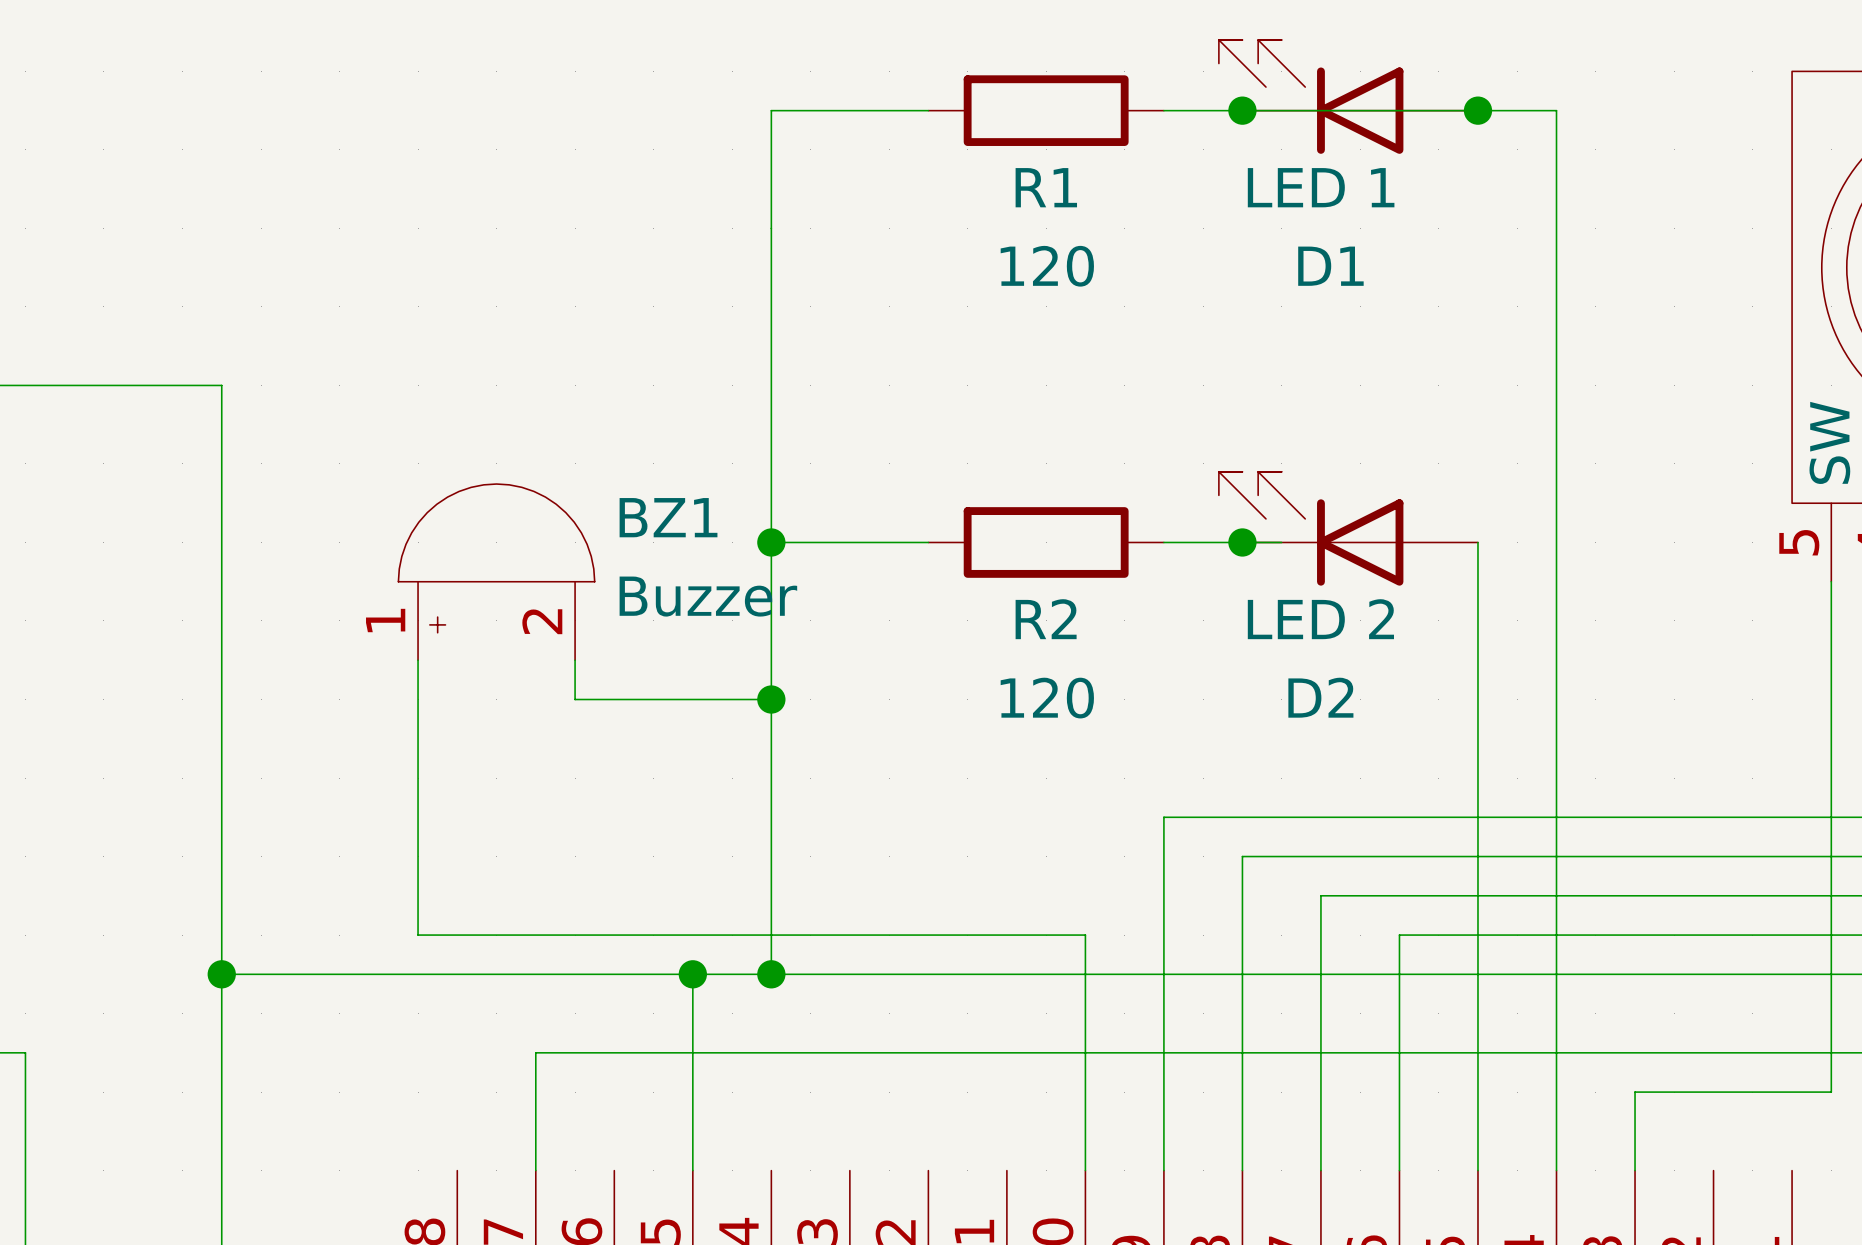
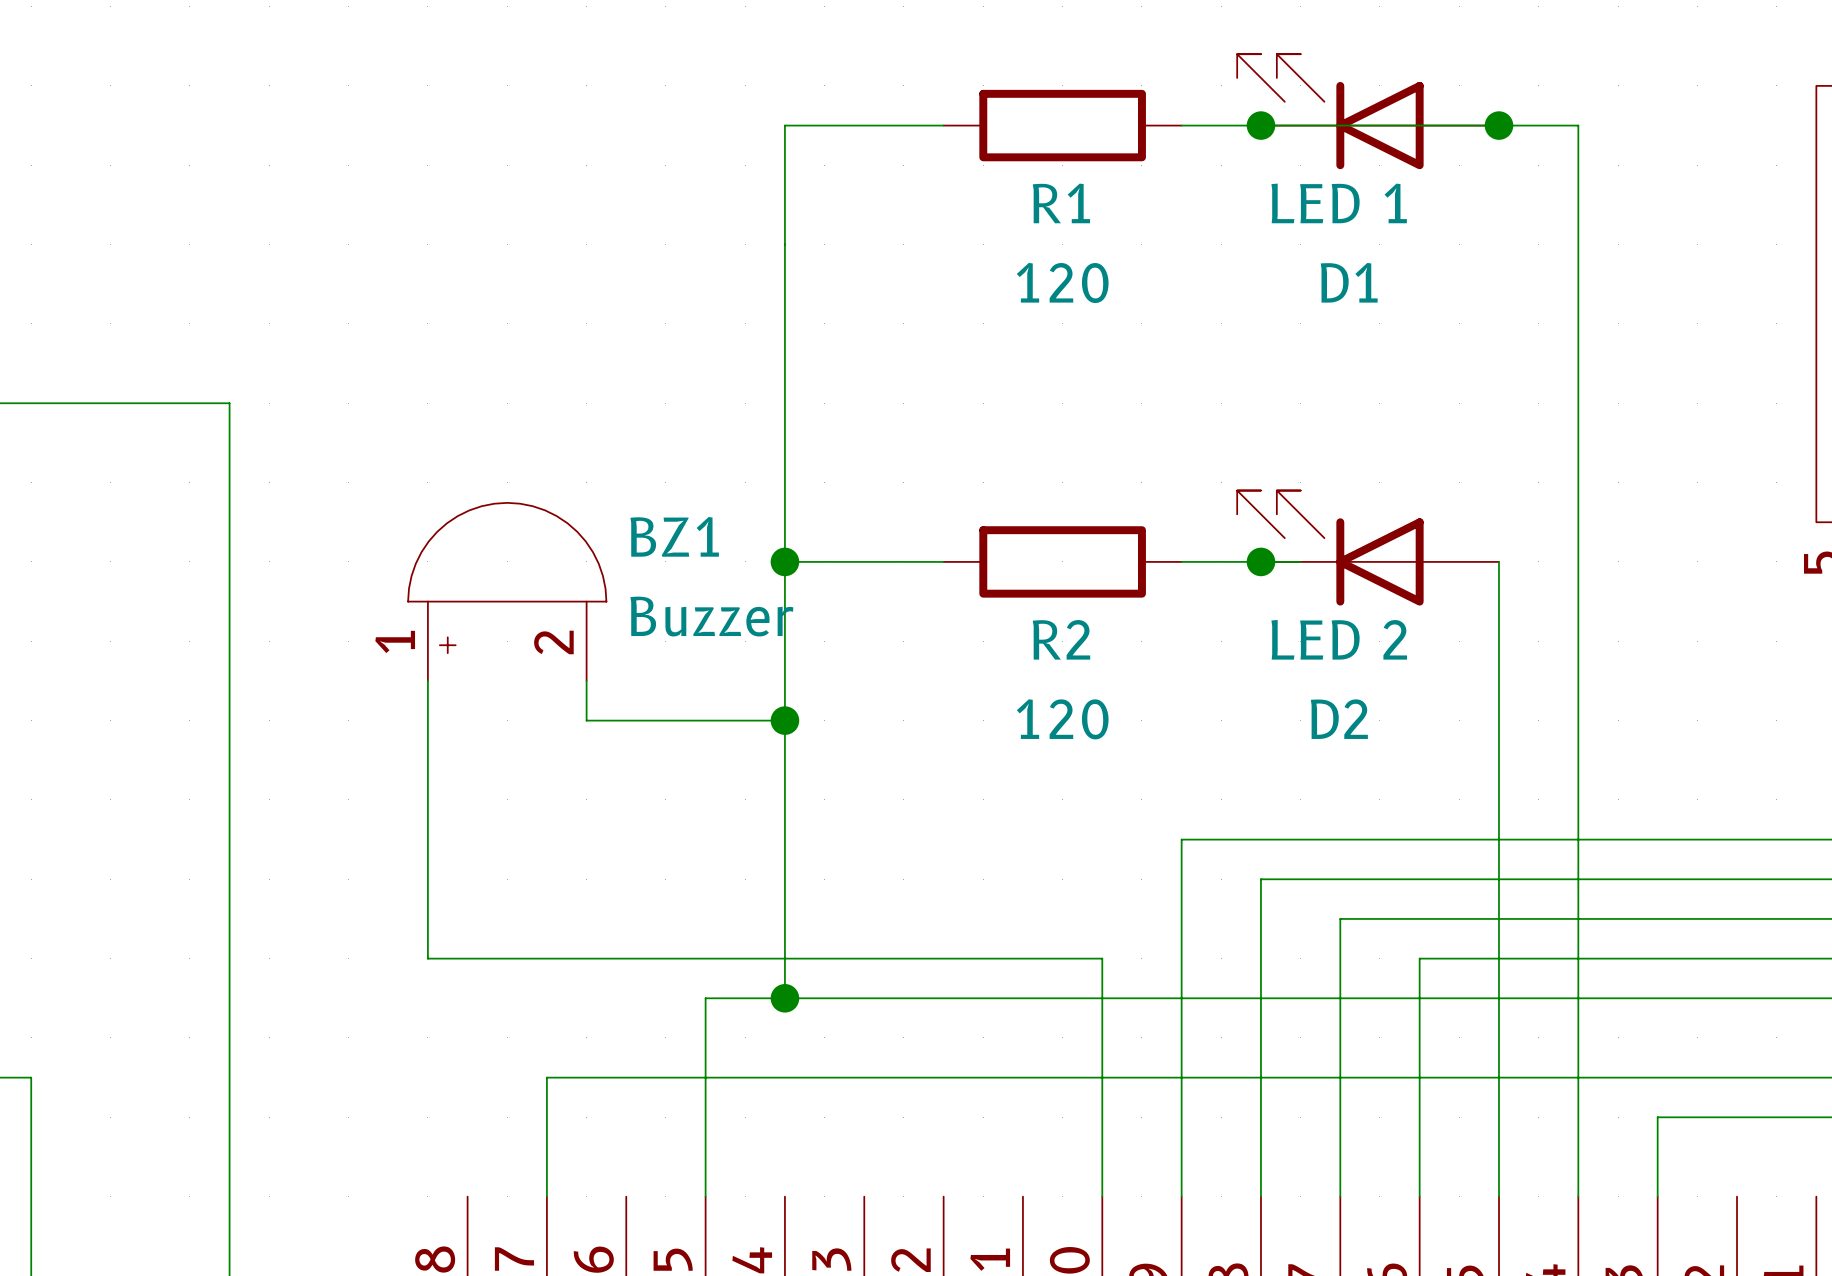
wire: (221, 974) (692, 974) -> none
junction: (221, 974) -> none
junction: (692, 974) -> none

